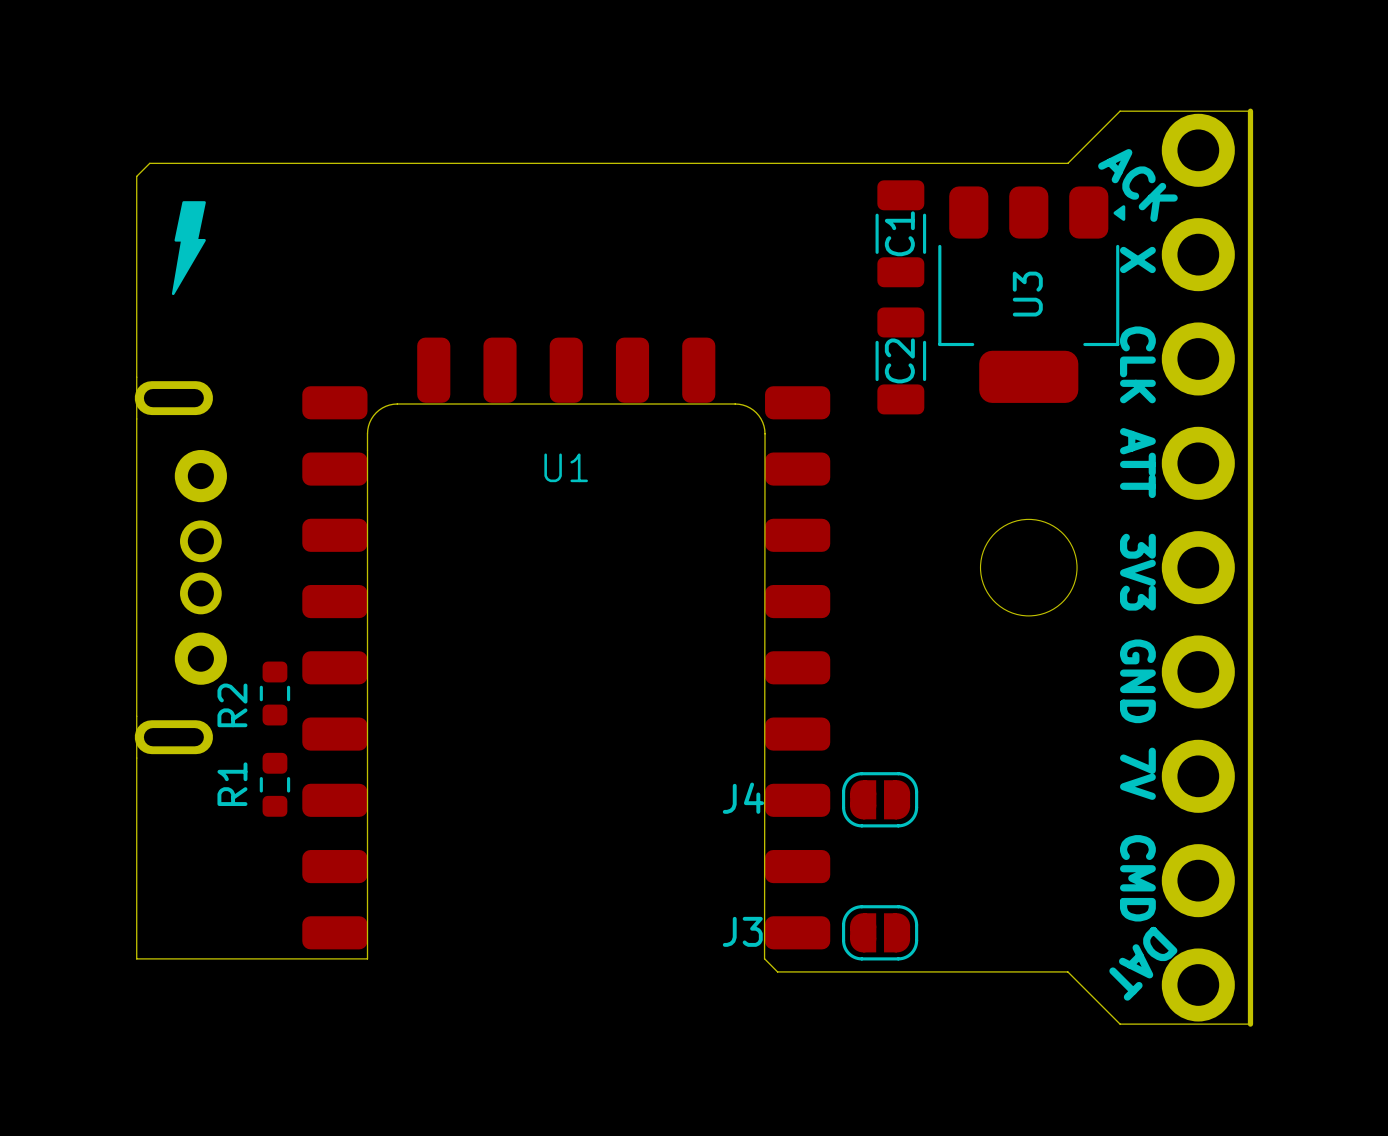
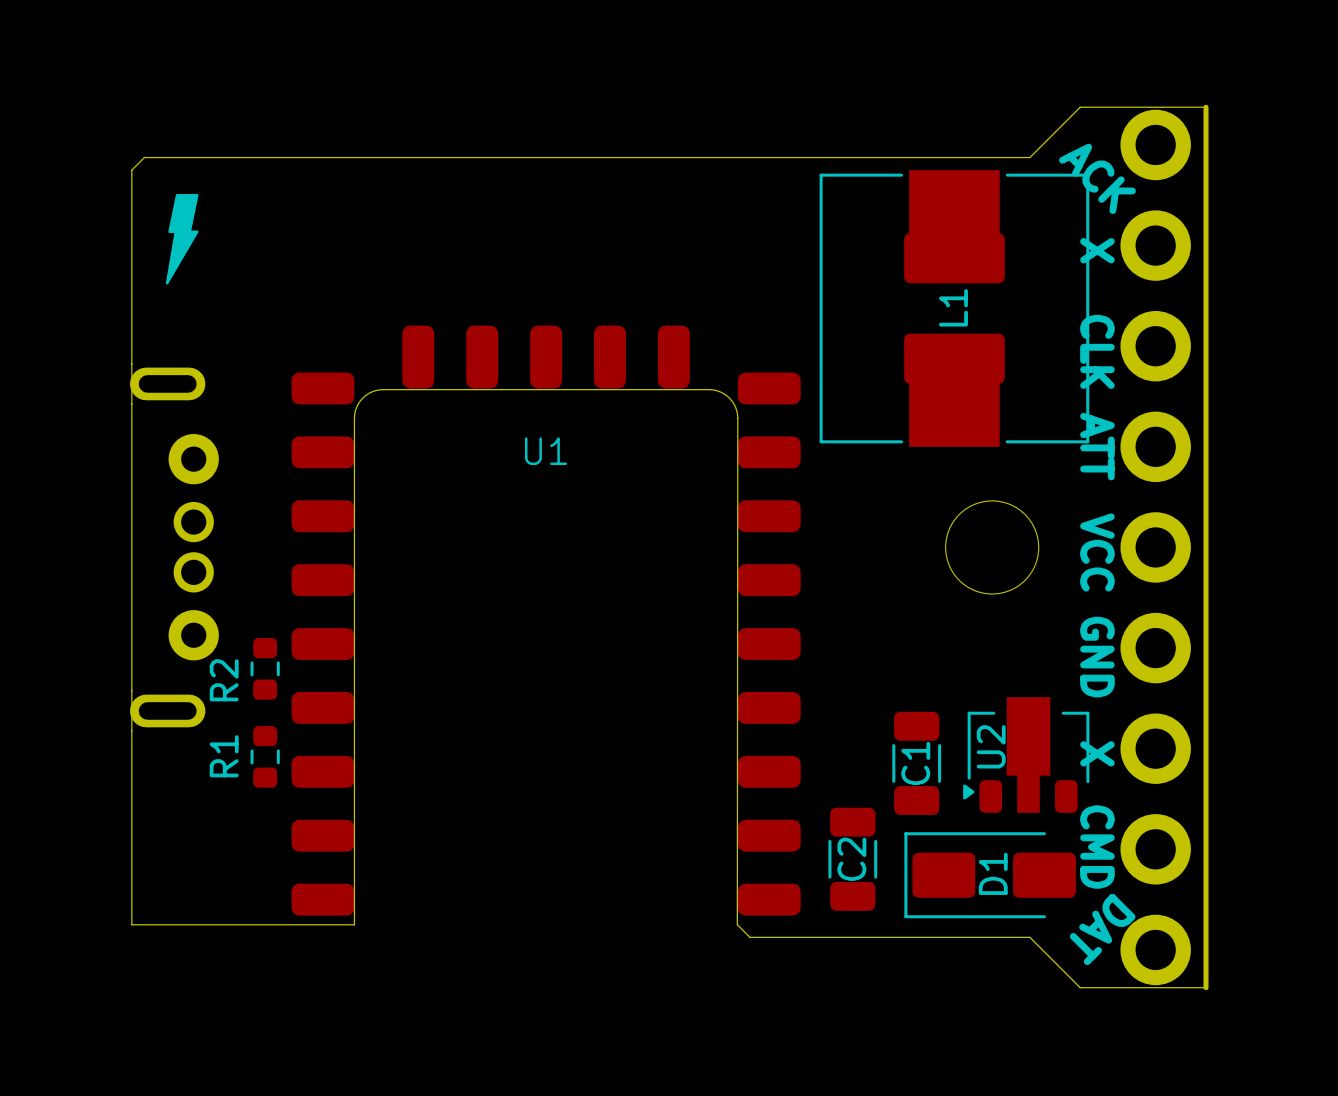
C1 position: (900, 233) -> (916, 763)
U3: (1031, 294) -> none
L1: none -> (954, 308)
C2 position: (900, 360) -> (852, 859)
text: 3V3 (1137, 572) -> VCC (1097, 552)
text: 7V (1137, 773) -> X (1097, 753)
U2: none -> (1026, 754)
J4: (880, 799) -> none
D1: none -> (990, 875)
J3: (880, 932) -> none

